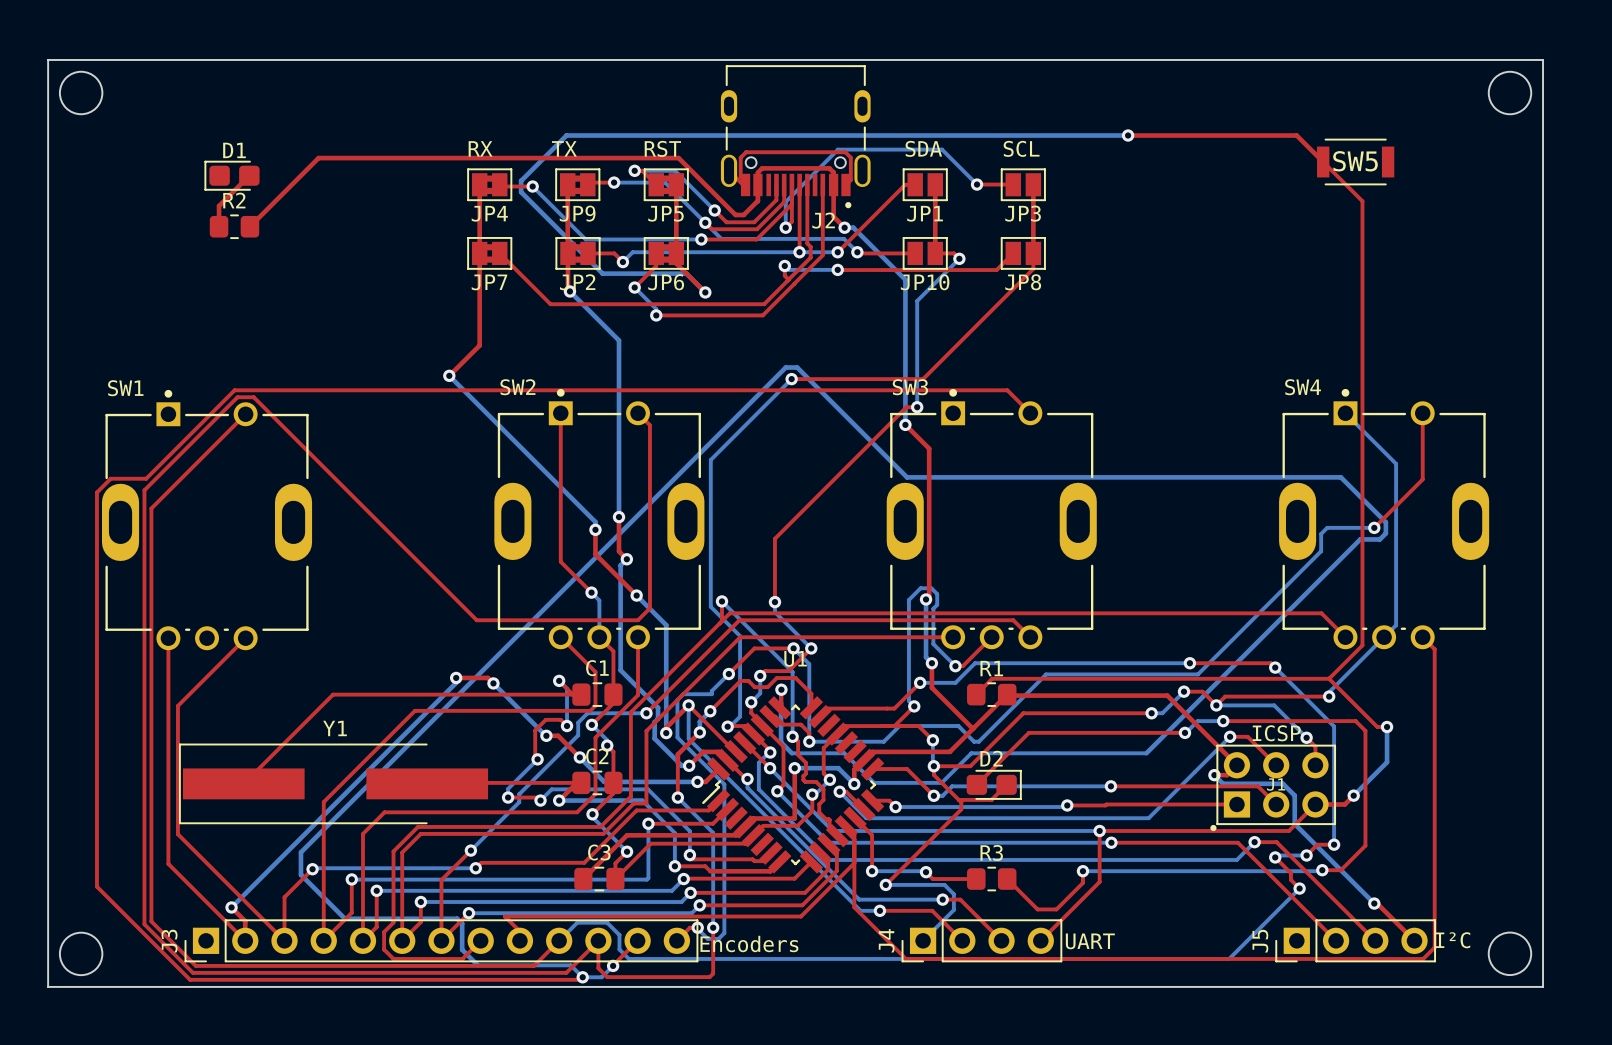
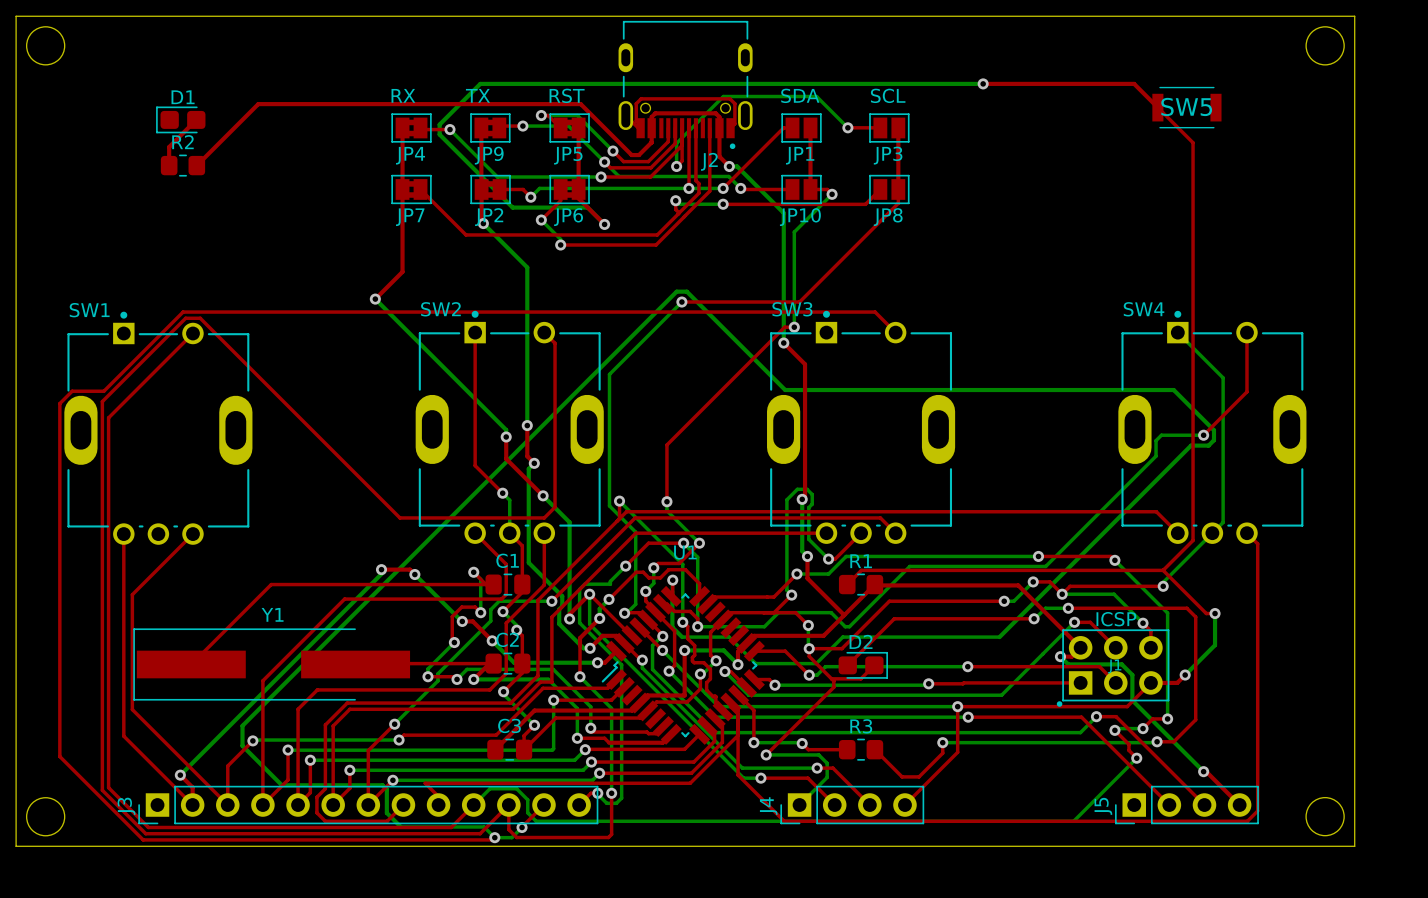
text: I²C (1452, 940) -> none
text: UART (1090, 941) -> none
text: Encoders (749, 944) -> none

